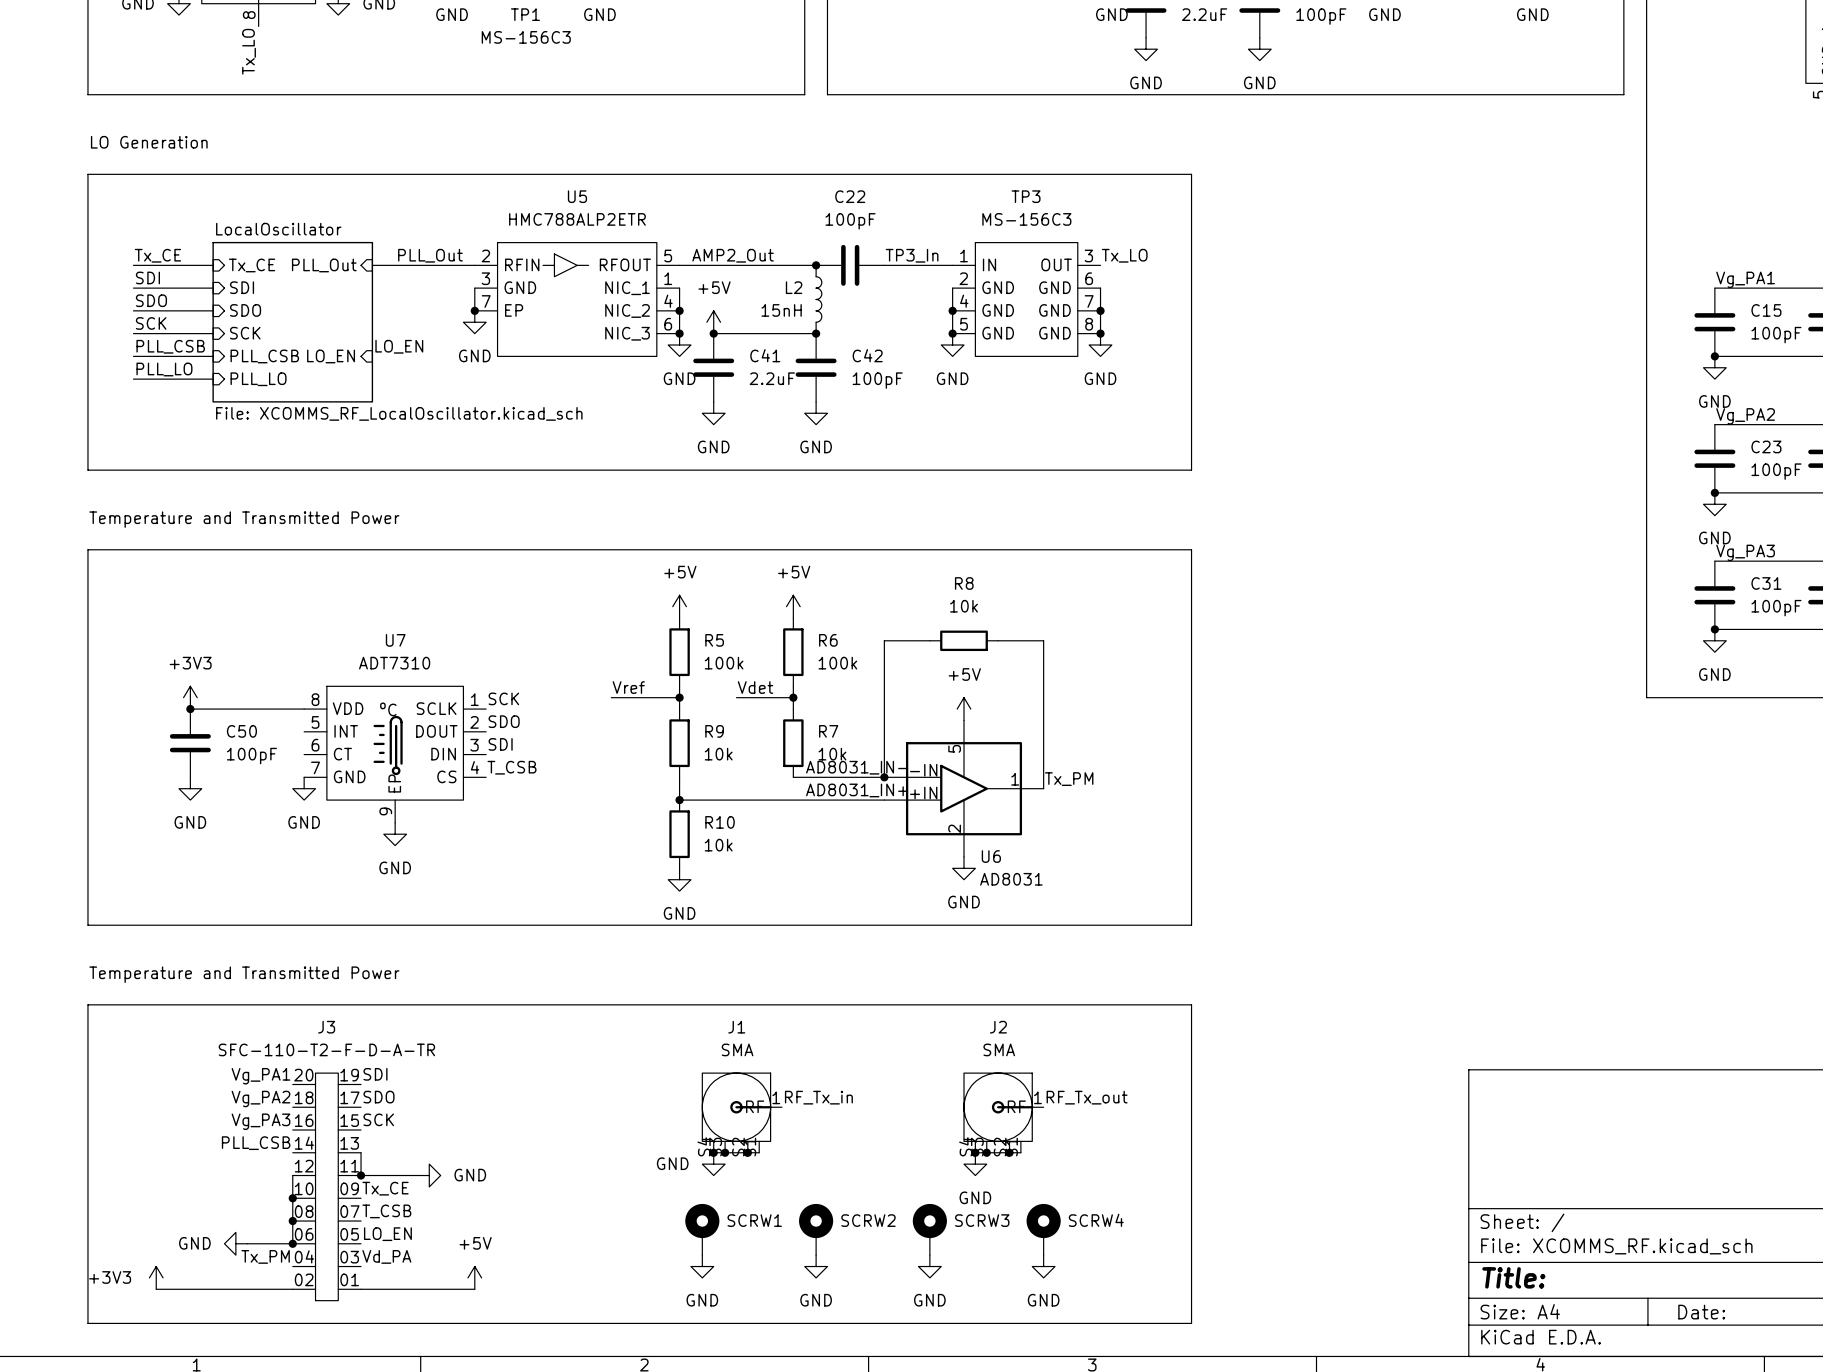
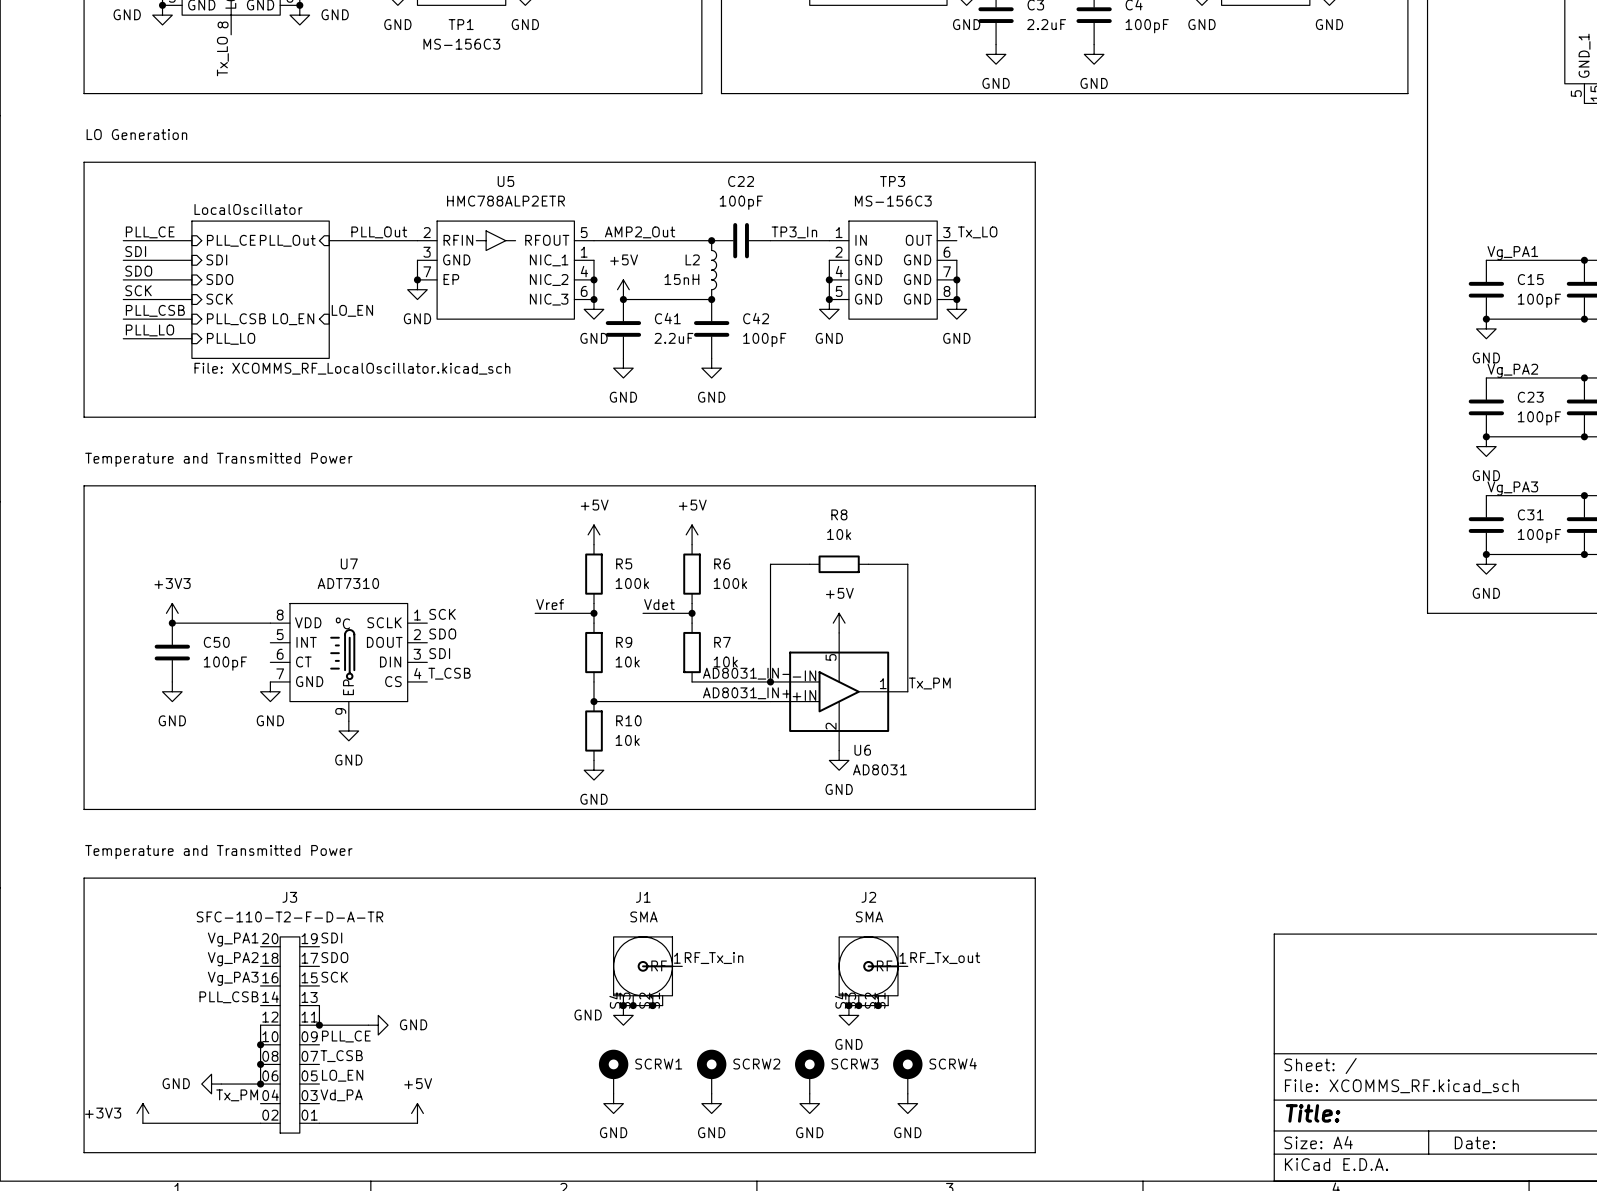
label: Tx_CE (157, 255) -> PLL_CE (150, 232)
sheet pin: Tx_CE (252, 265) -> PLL_CE (231, 240)
label: Tx_CE (385, 1188) -> PLL_CE (346, 1036)

